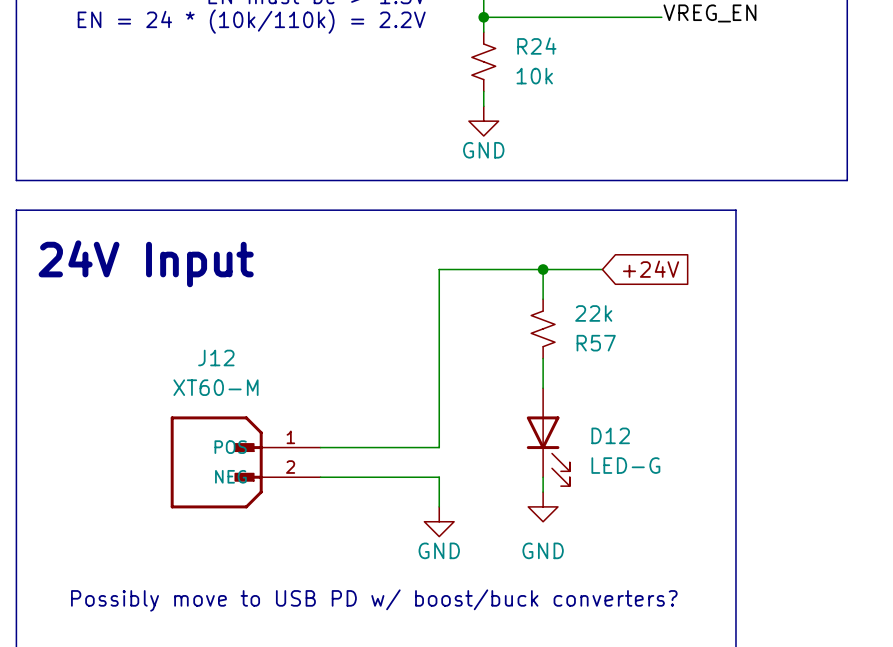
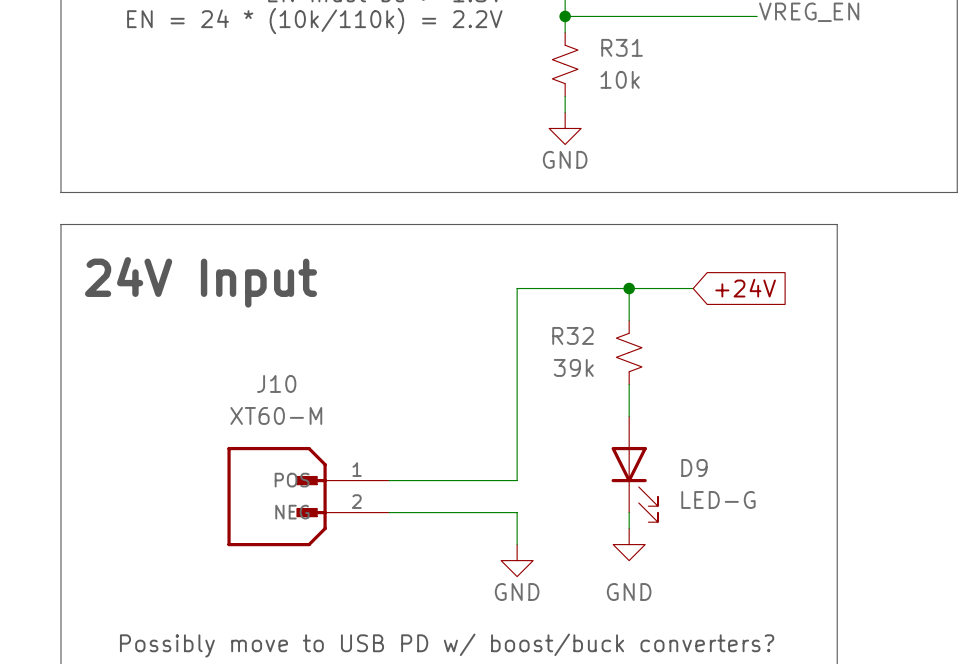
R24 name: R24 (536, 46) -> R31 (622, 47)
R57 value: 22k (593, 313) -> 39k (573, 367)
R57 name: R57 (596, 343) -> R32 (573, 335)
J12 name: J12 (216, 357) -> J10 (276, 383)
D12 name: D12 (610, 435) -> D9 (694, 467)

